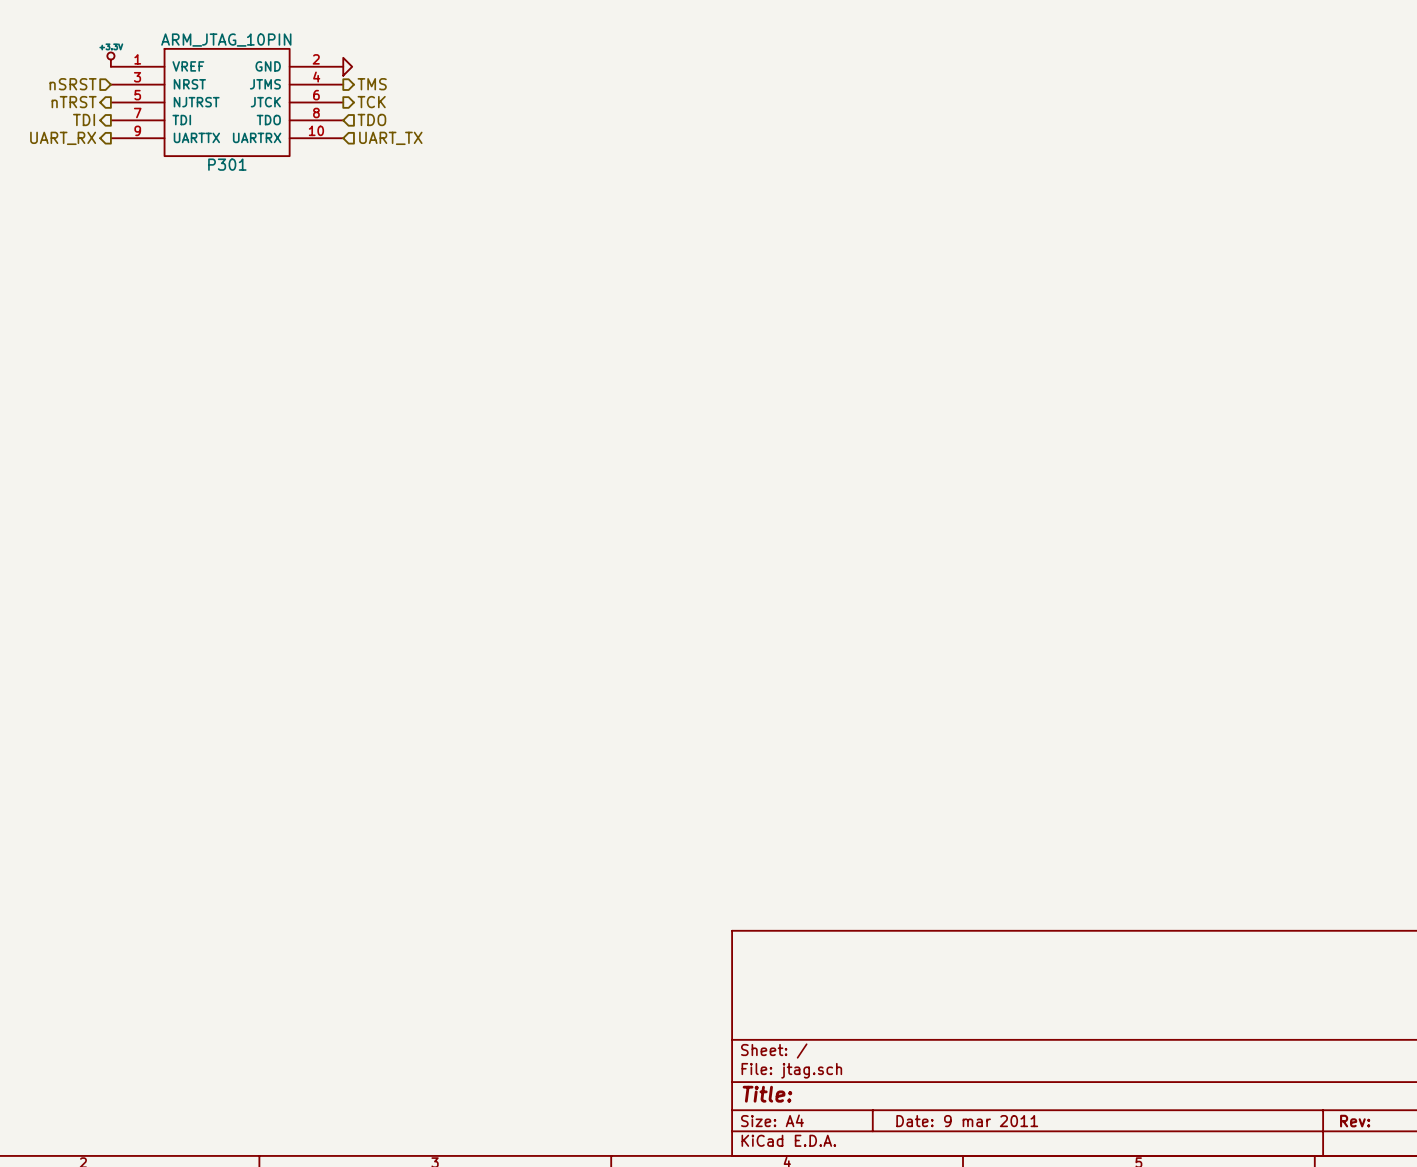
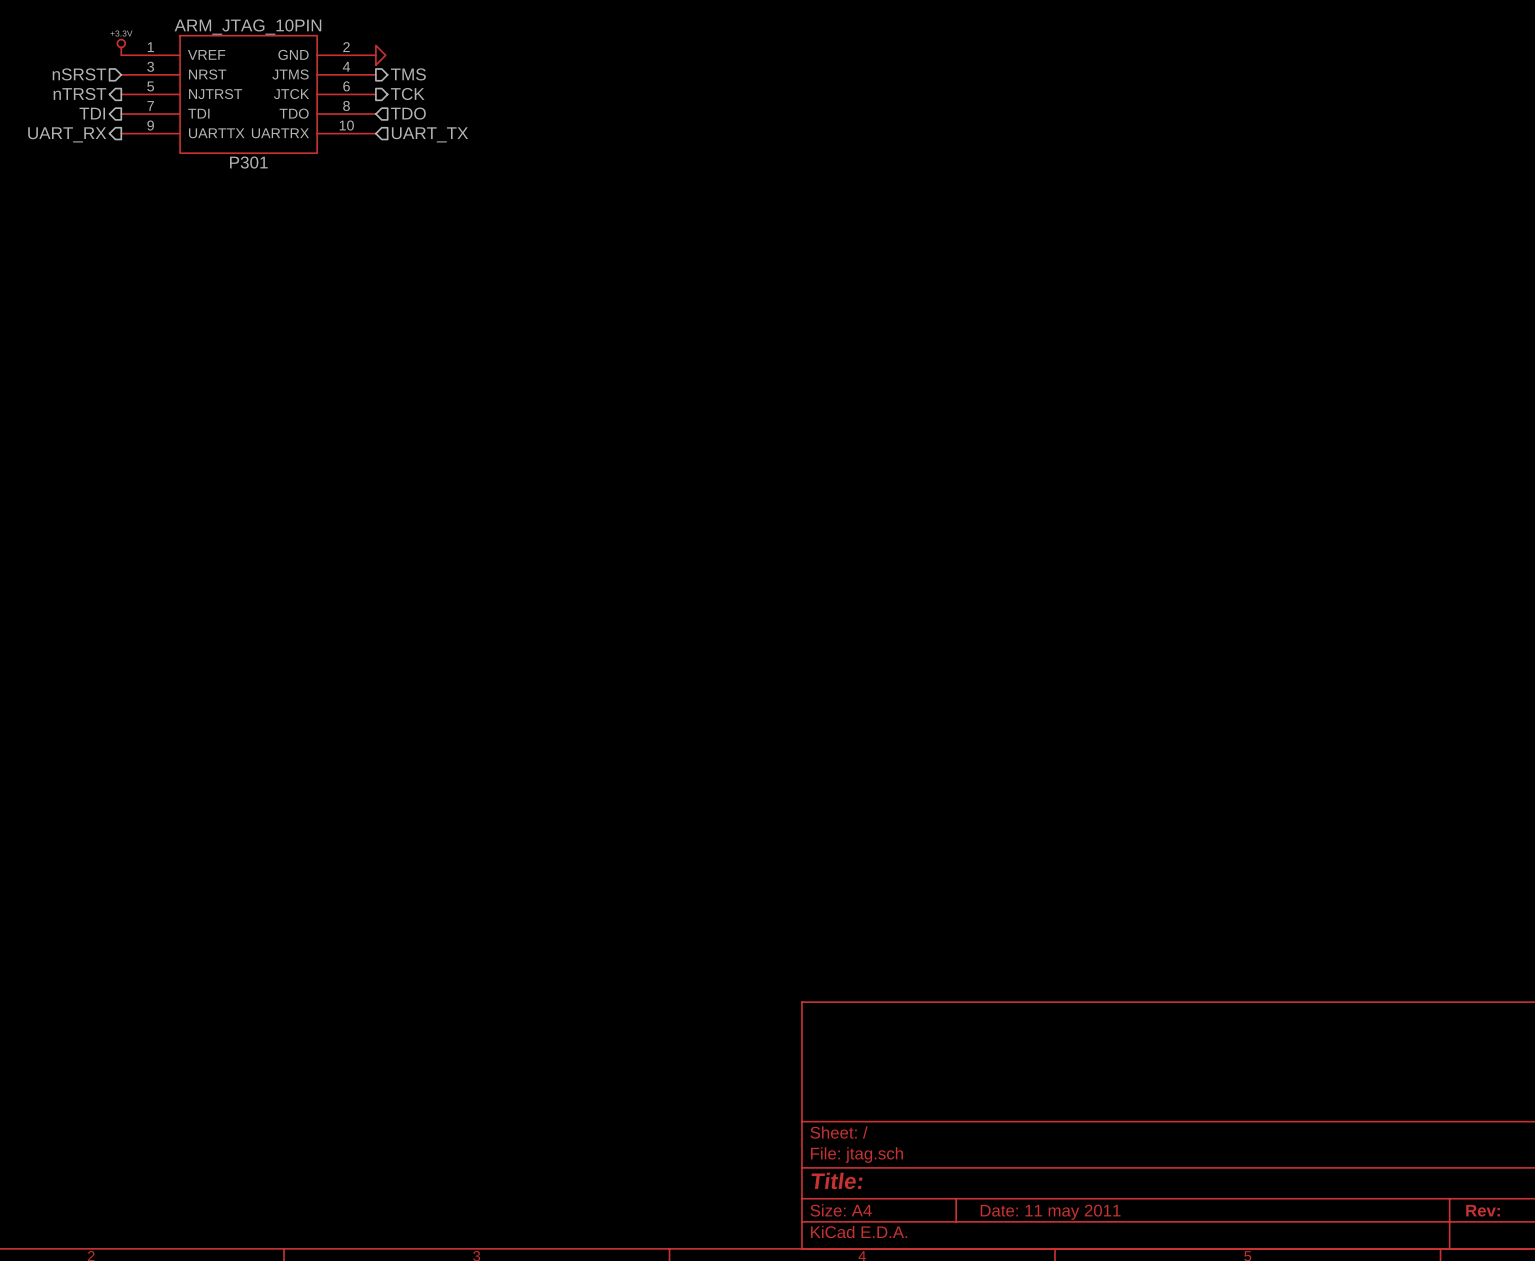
title block: Date: 9 mar 2011 (967, 1121) -> Date: 11 may 2011 (1050, 1212)

